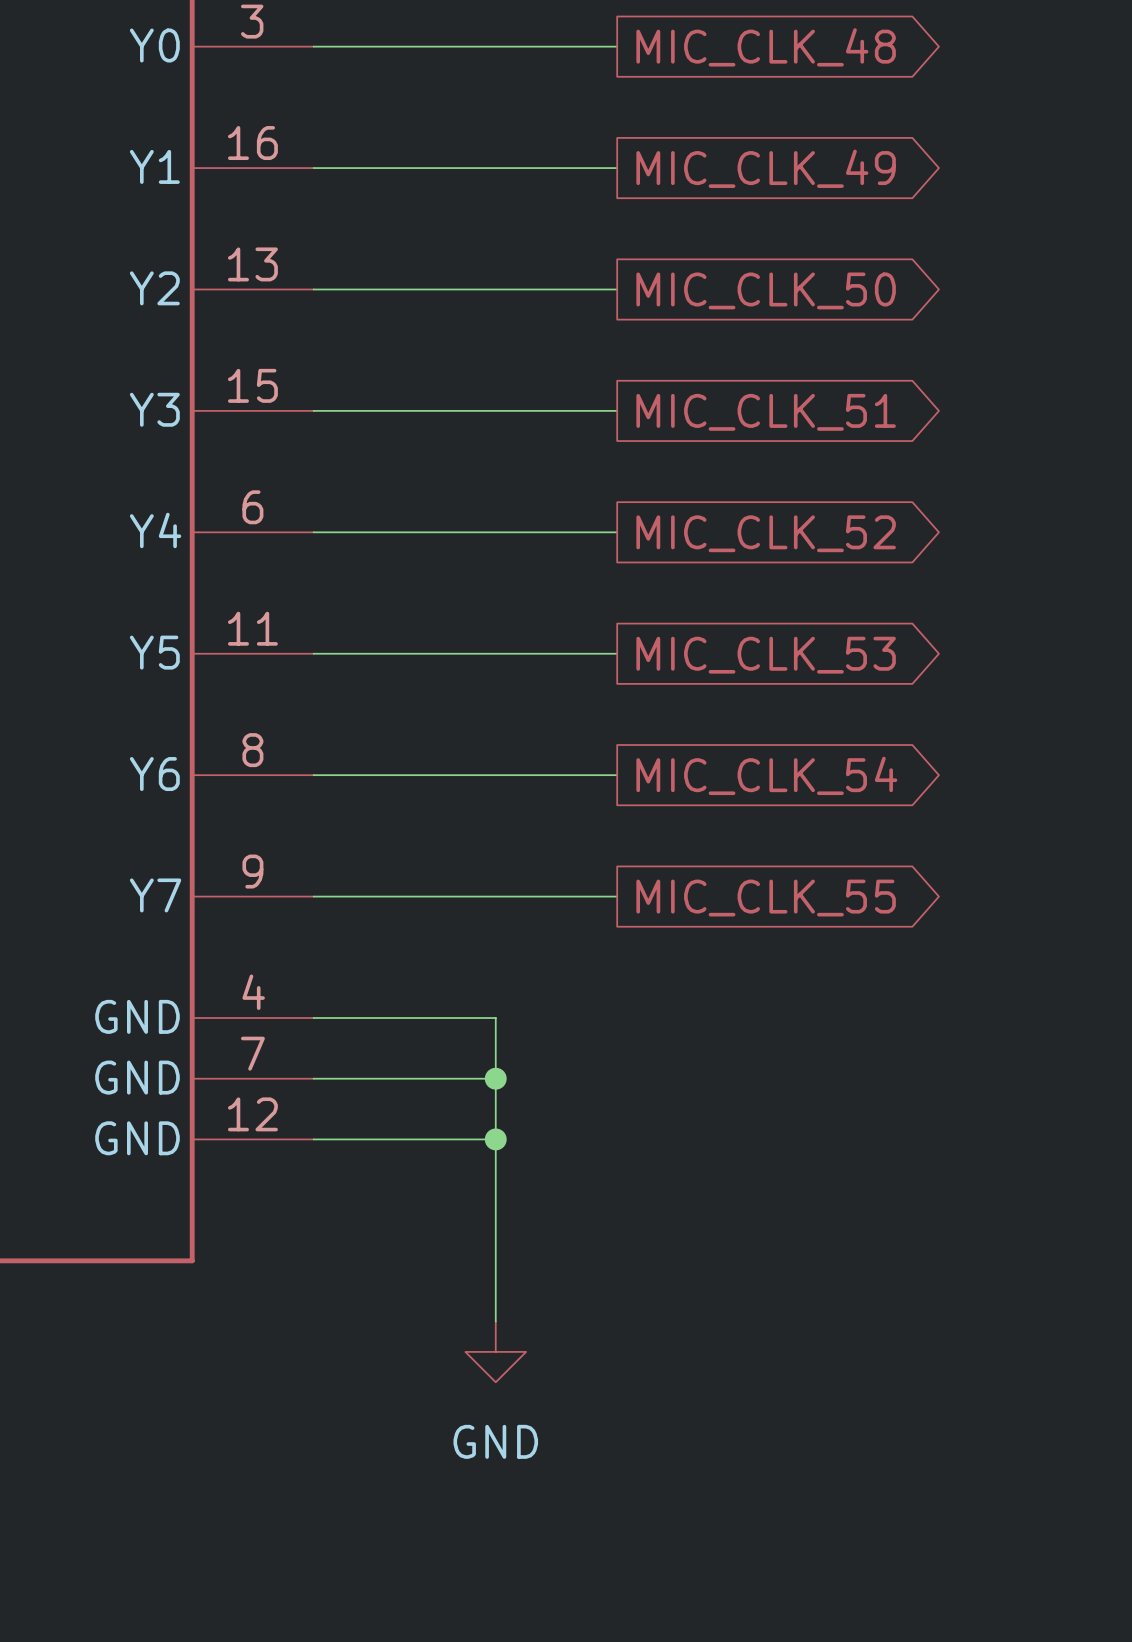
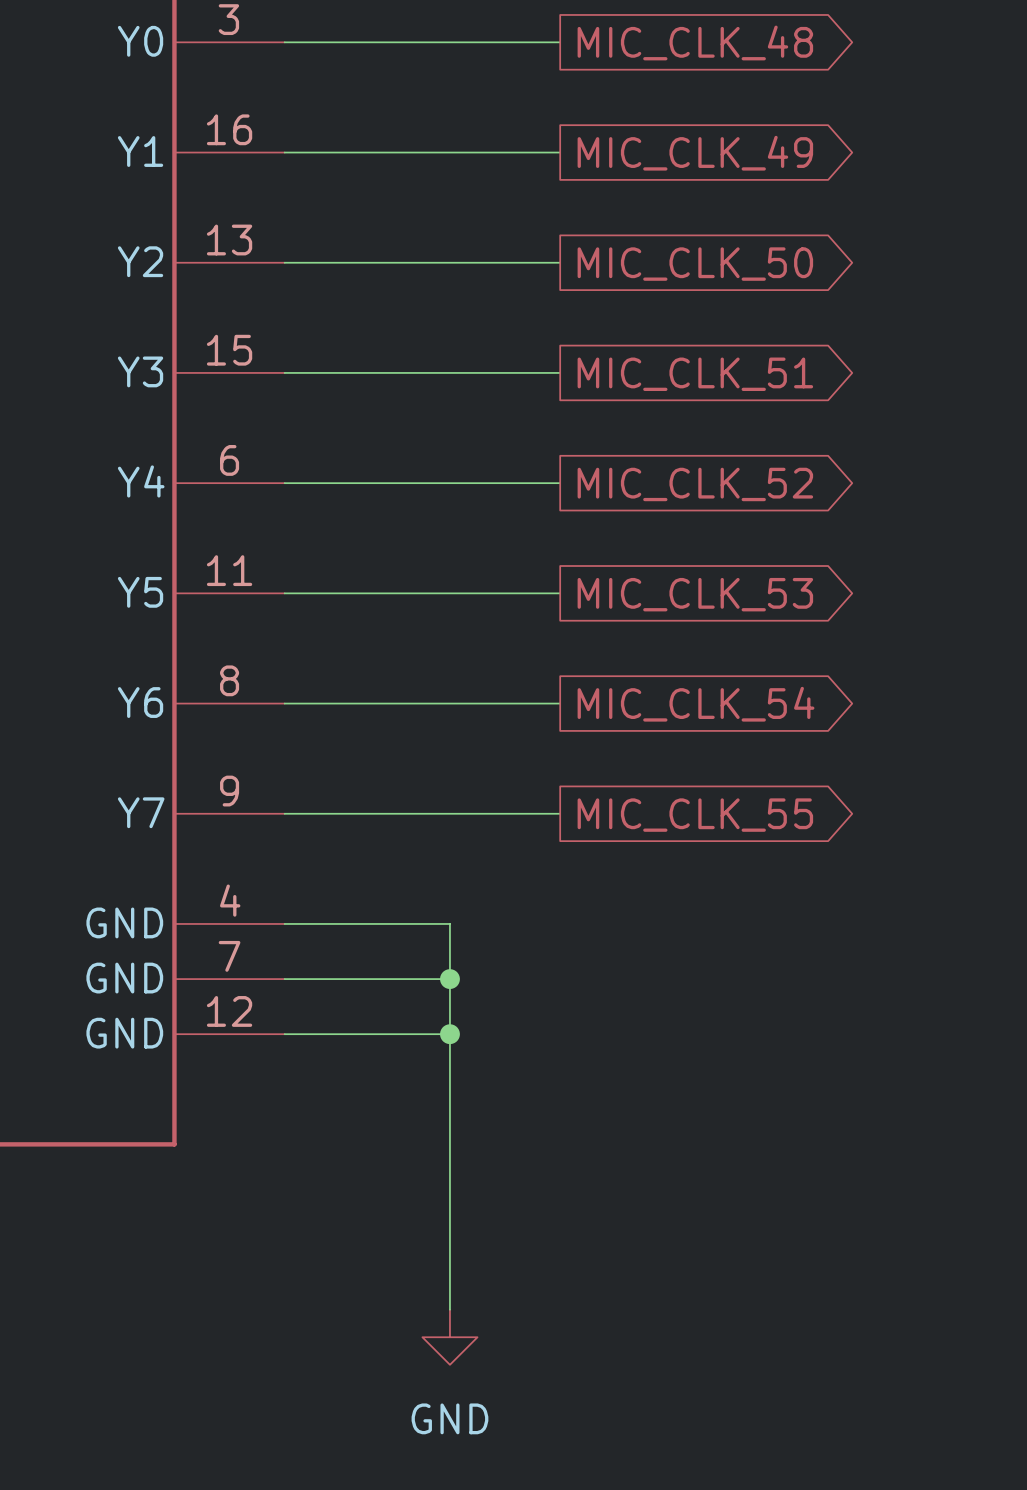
wire: none -> (449, 1199) (449, 1309)
power symbol position: GND (495, 1351) -> GND (449, 1337)

